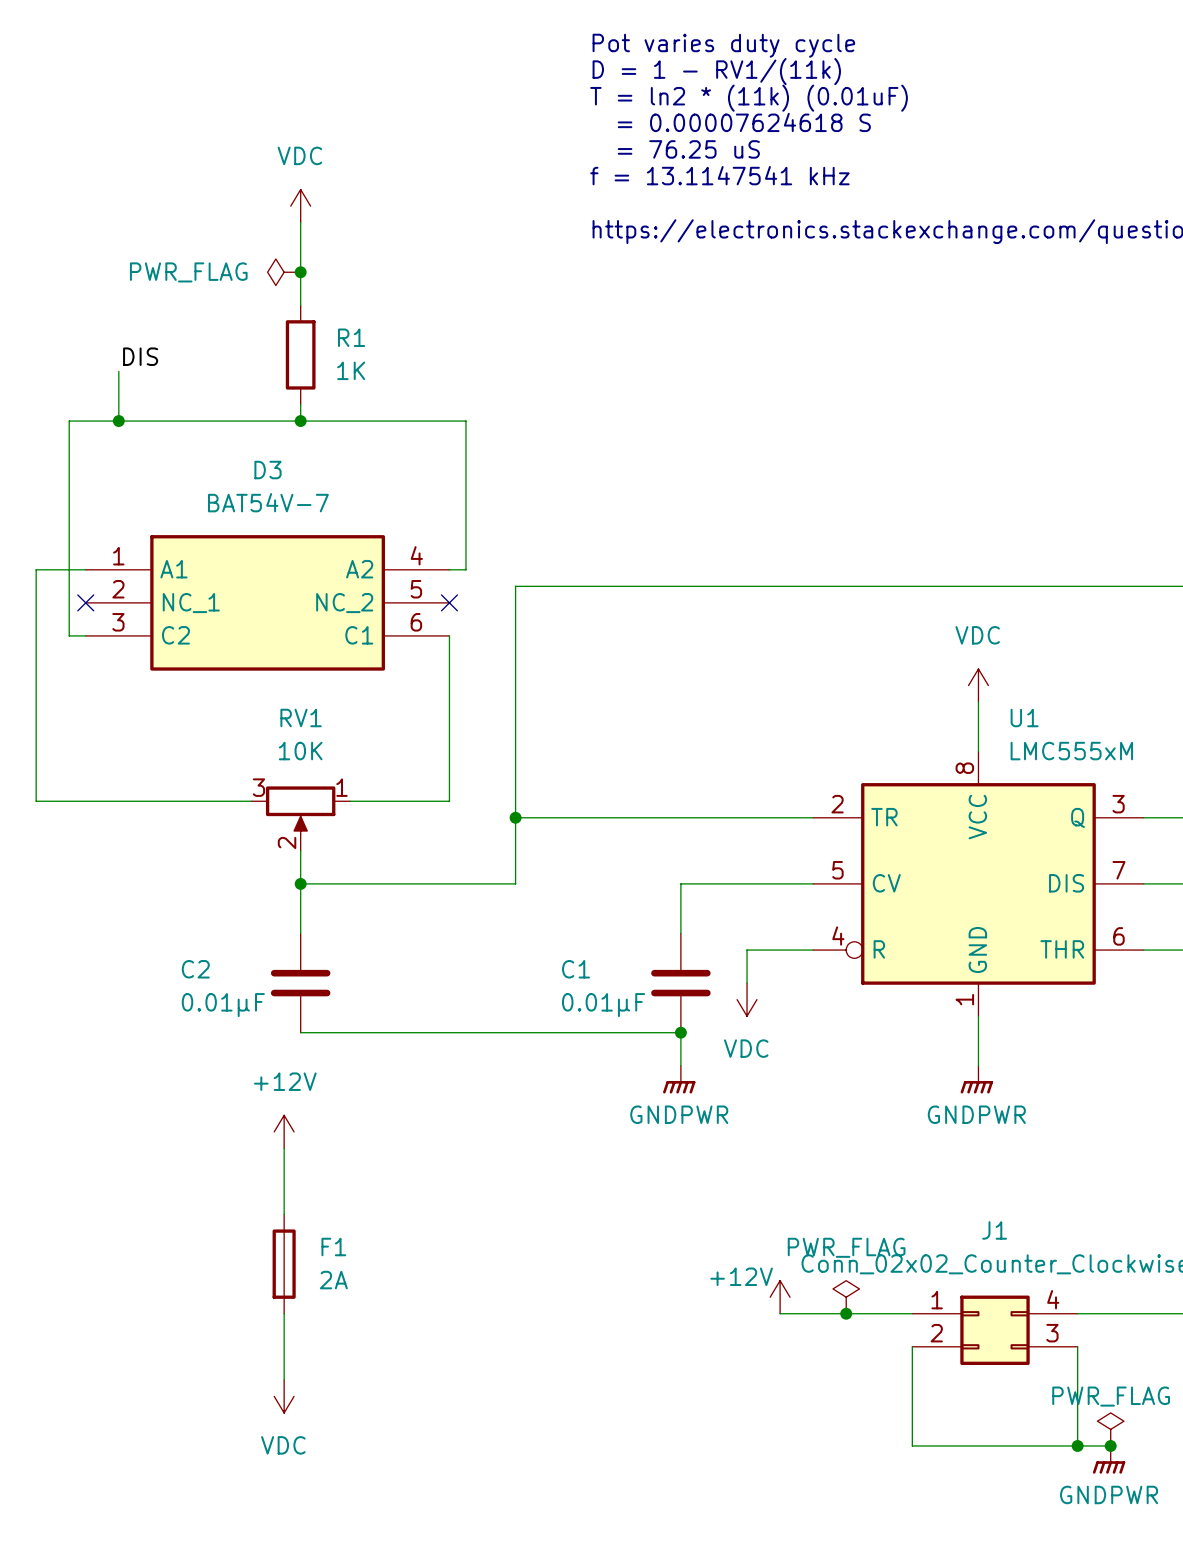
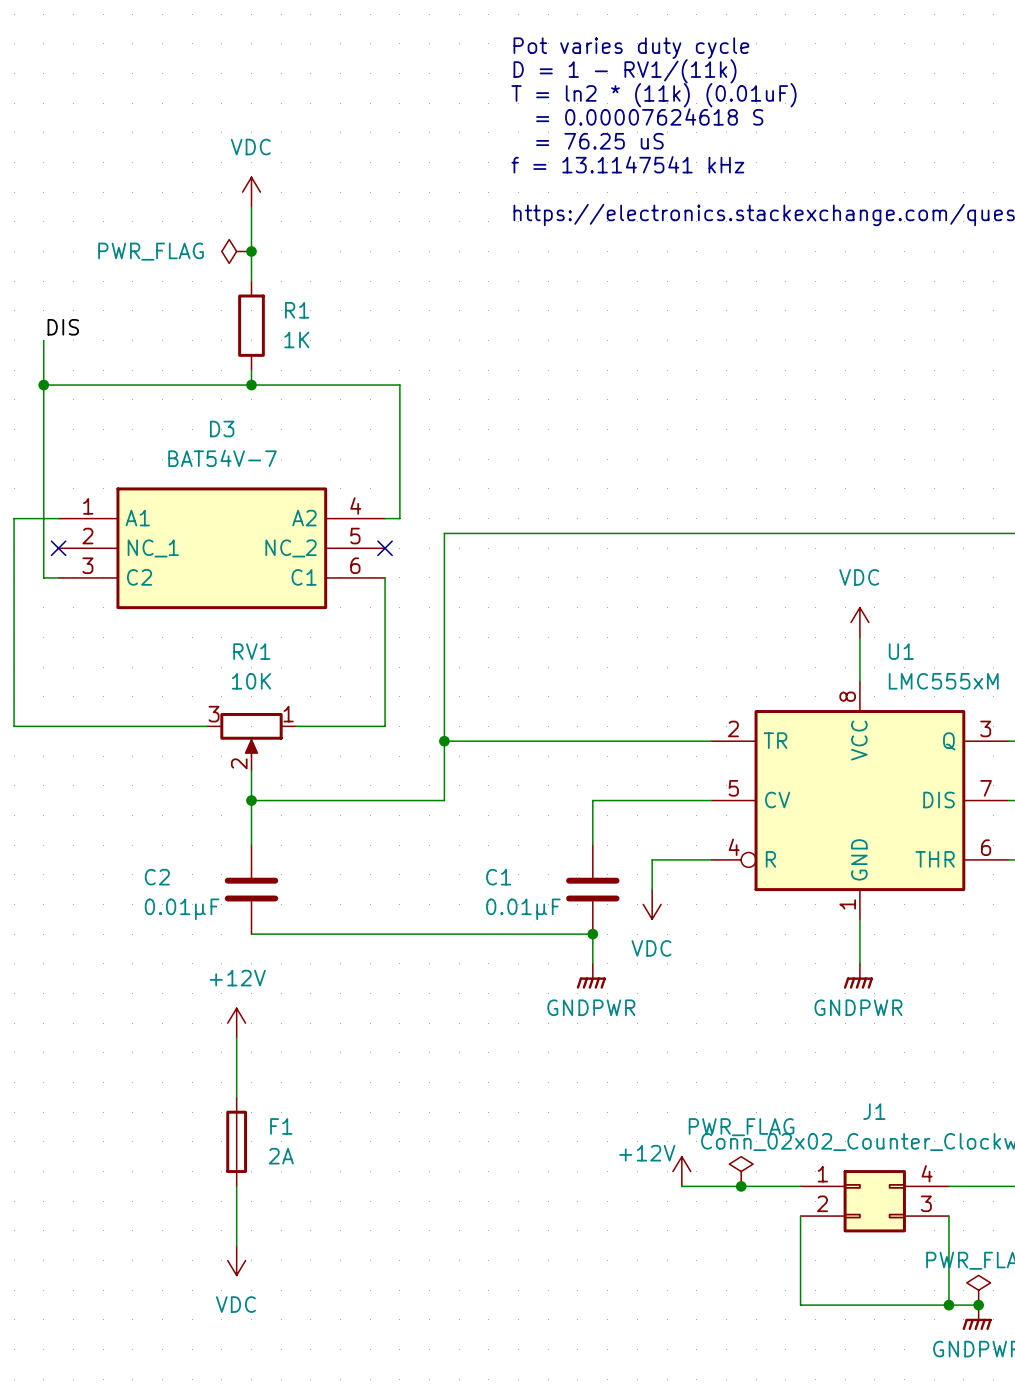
label position: DIS (140, 356) -> DIS (63, 327)
wire: (118, 371) (118, 421) -> (43, 340) (43, 385)
junction position: (118, 421) -> (43, 385)

